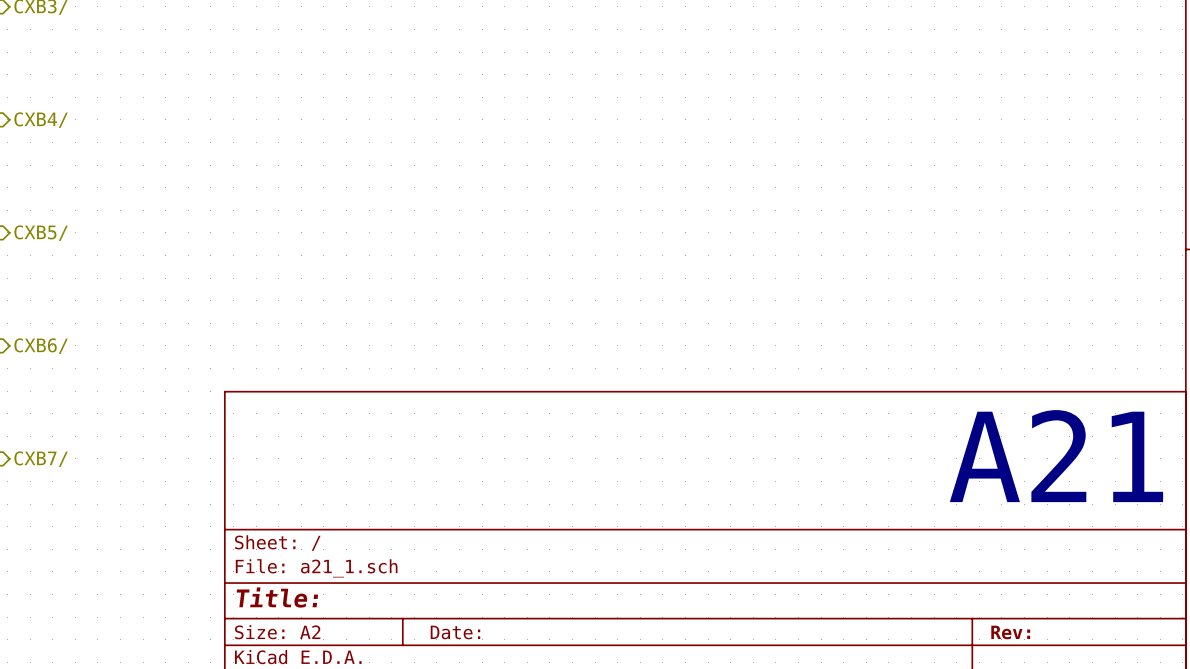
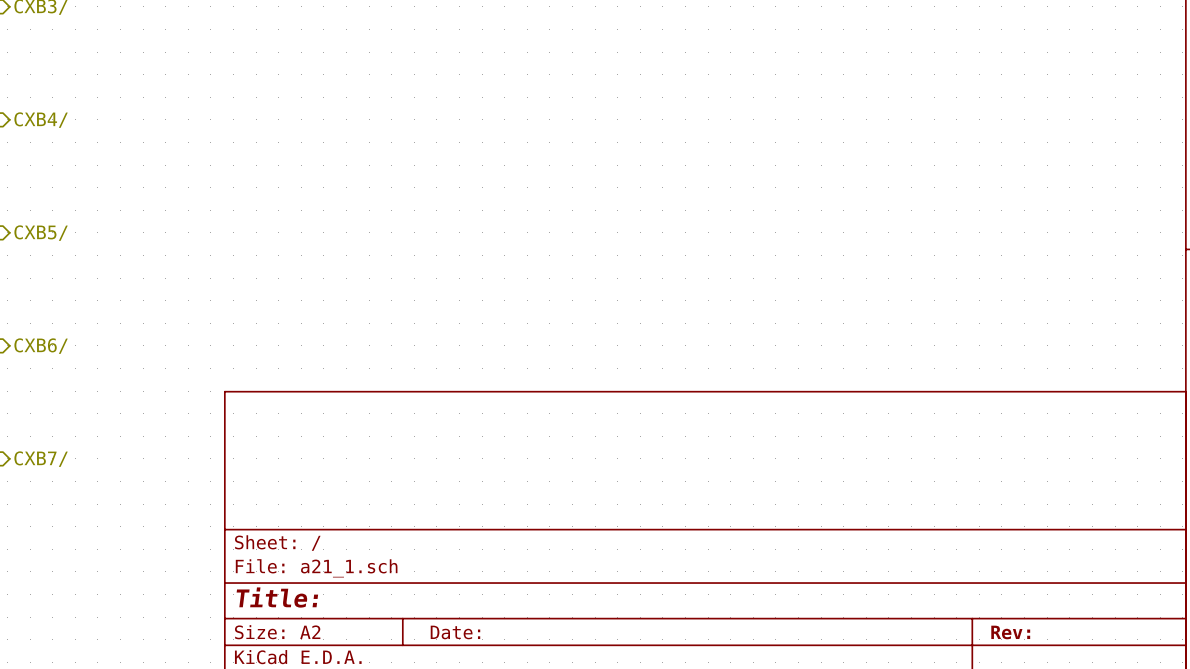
text: A21 (1056, 456) -> none

